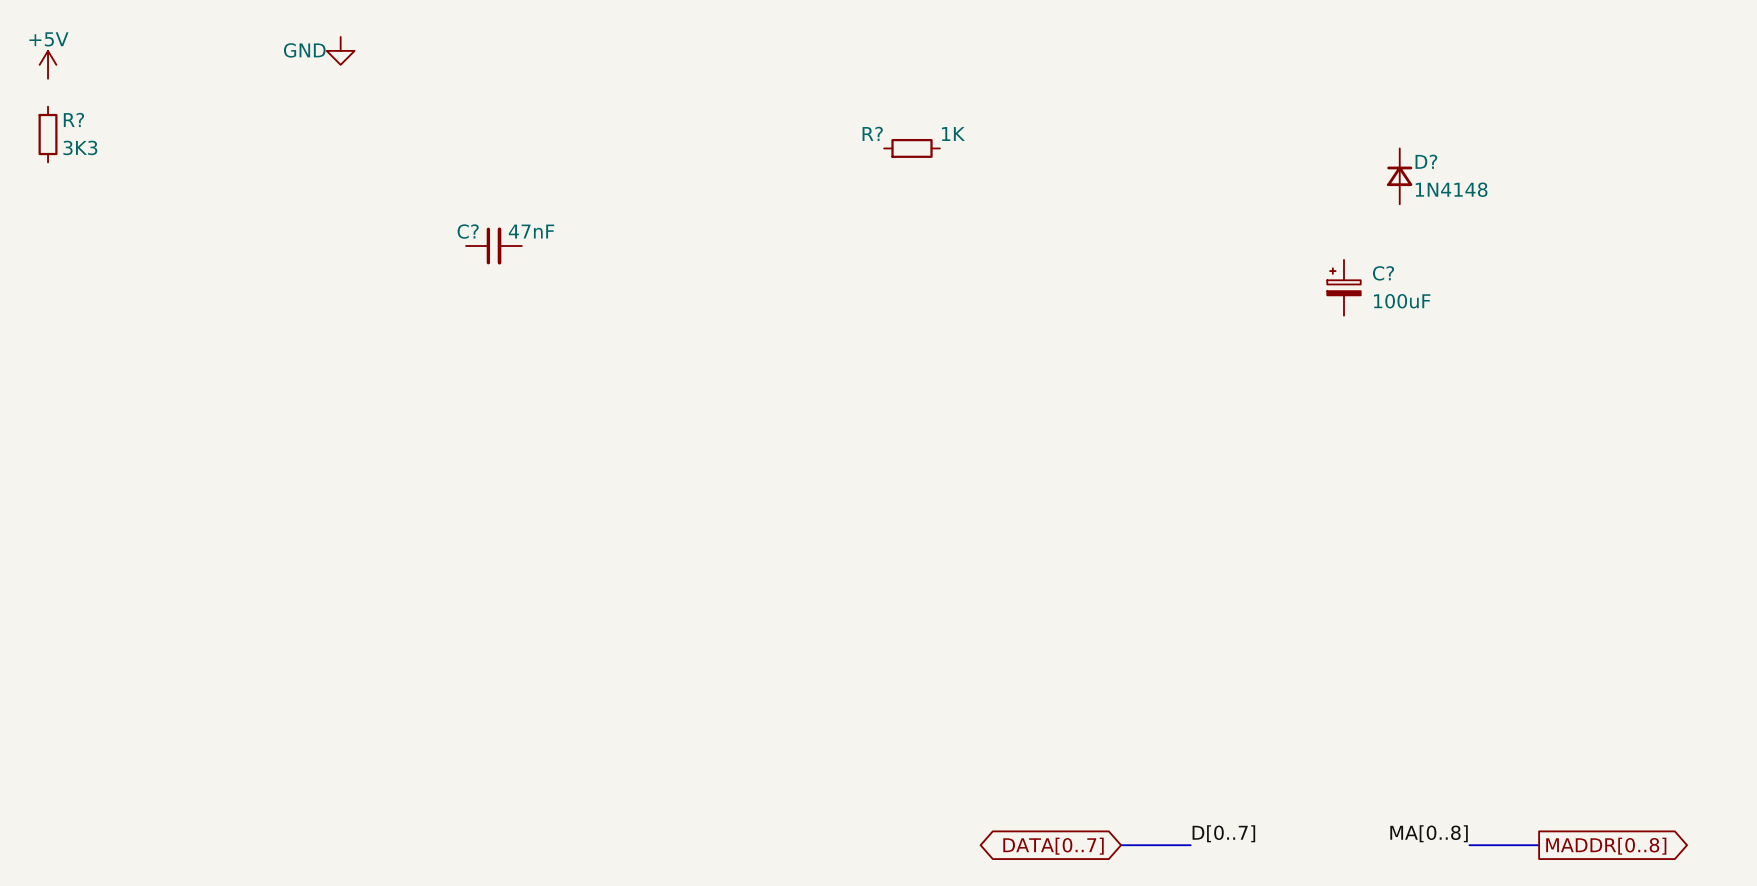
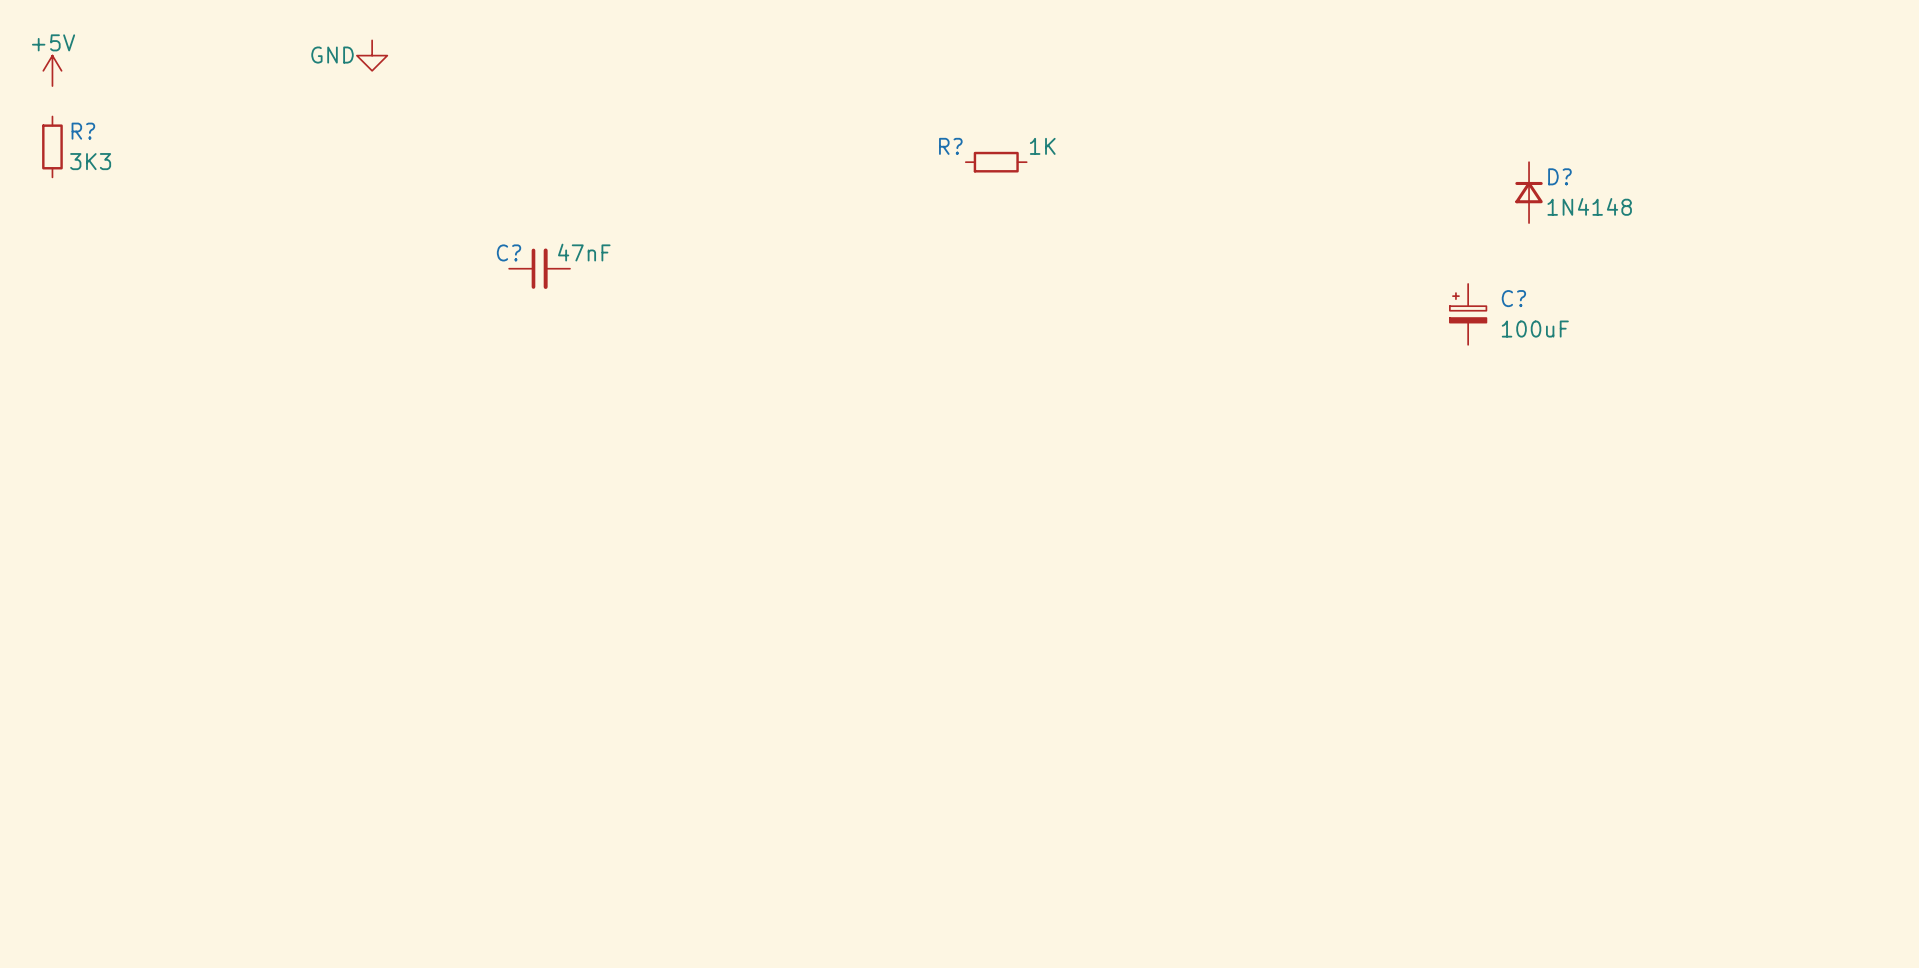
label: D[0..7] (1223, 833) -> none
label: MA[0..8] (1429, 833) -> none
bus: (1121, 845) (1190, 845) -> none
bus: (1469, 845) (1539, 845) -> none
global label: DATA[0..7] (1053, 846) -> none
global label: MADDR[0..8] (1606, 846) -> none

